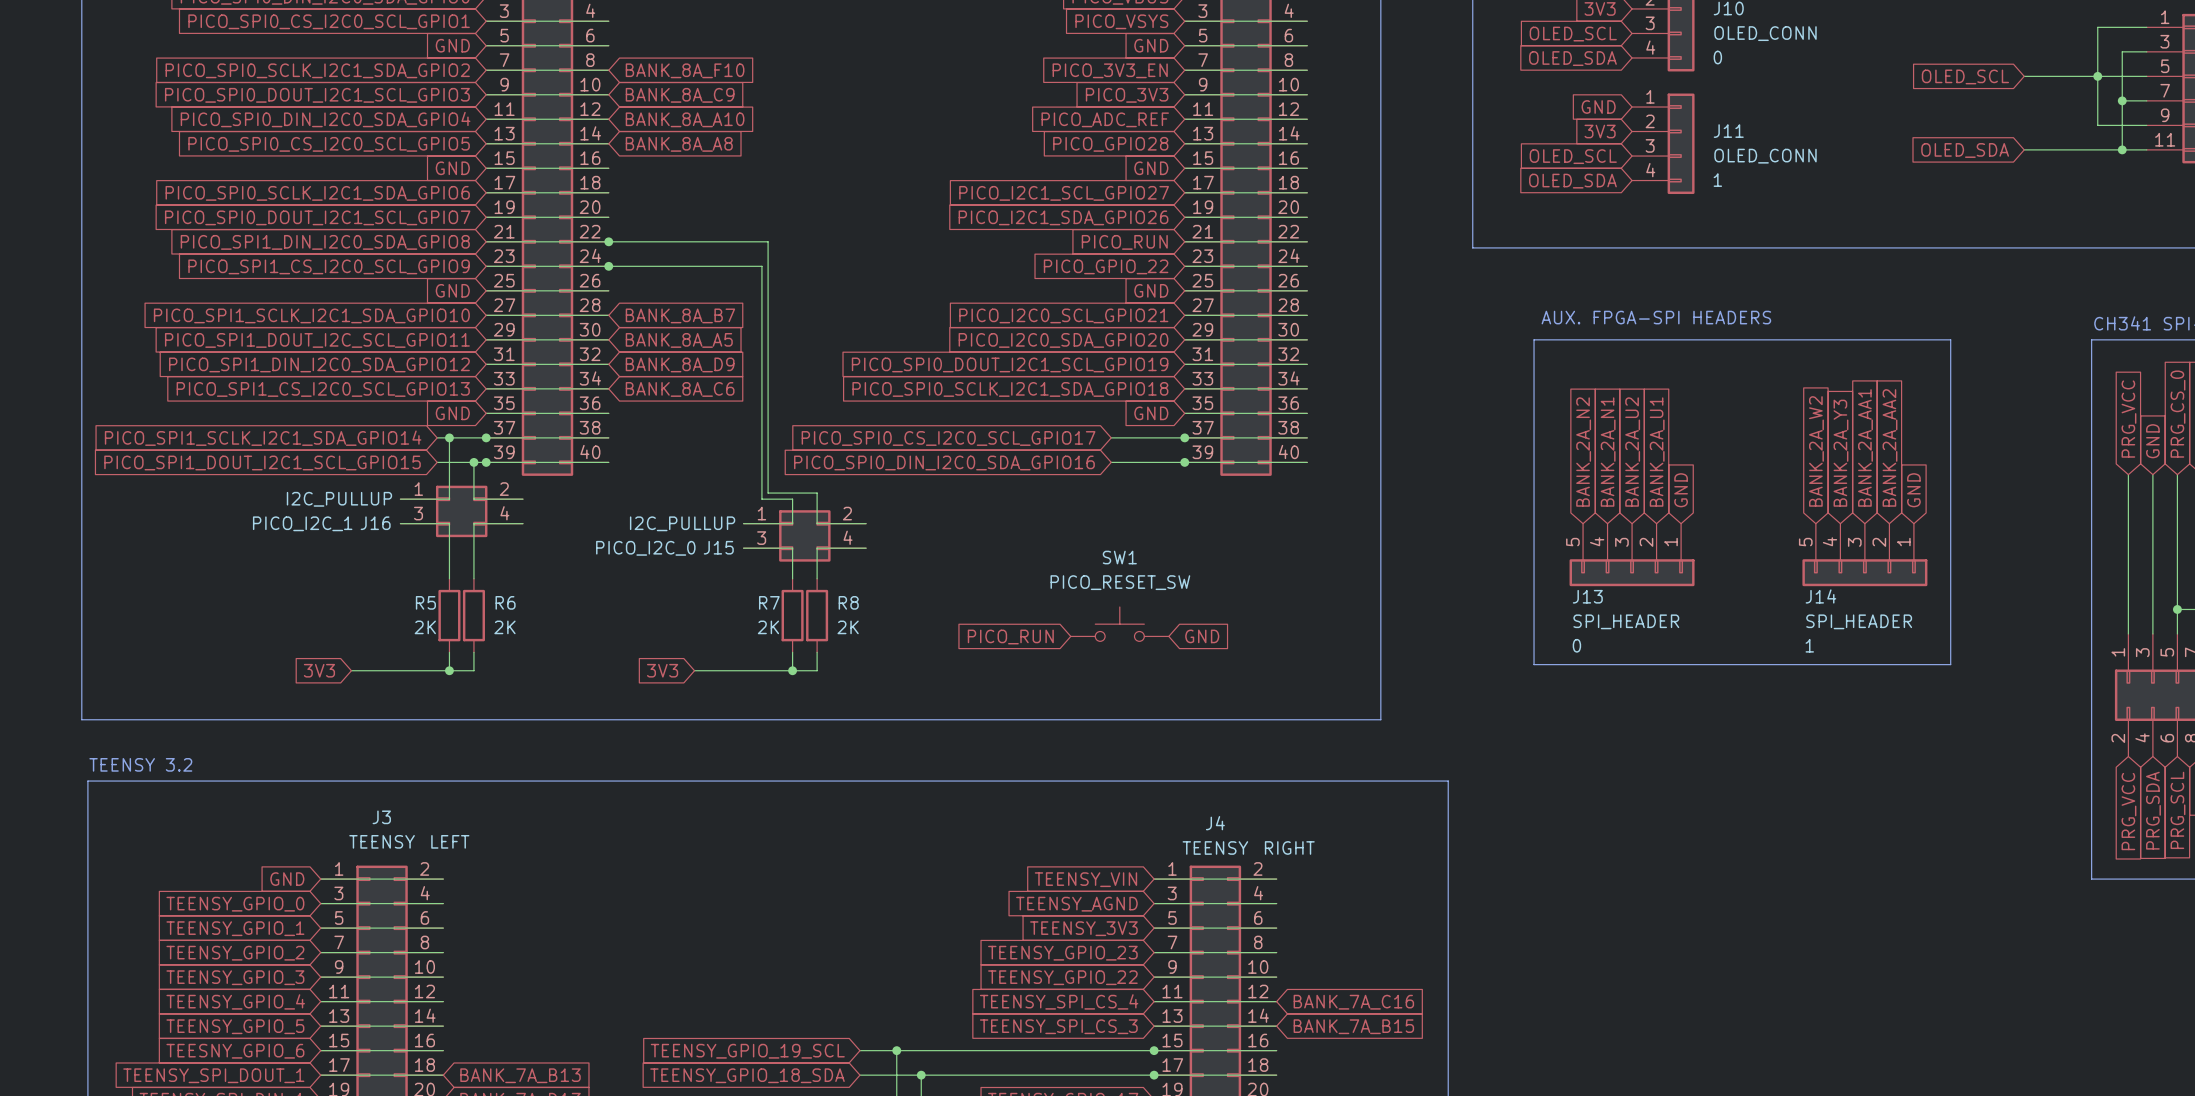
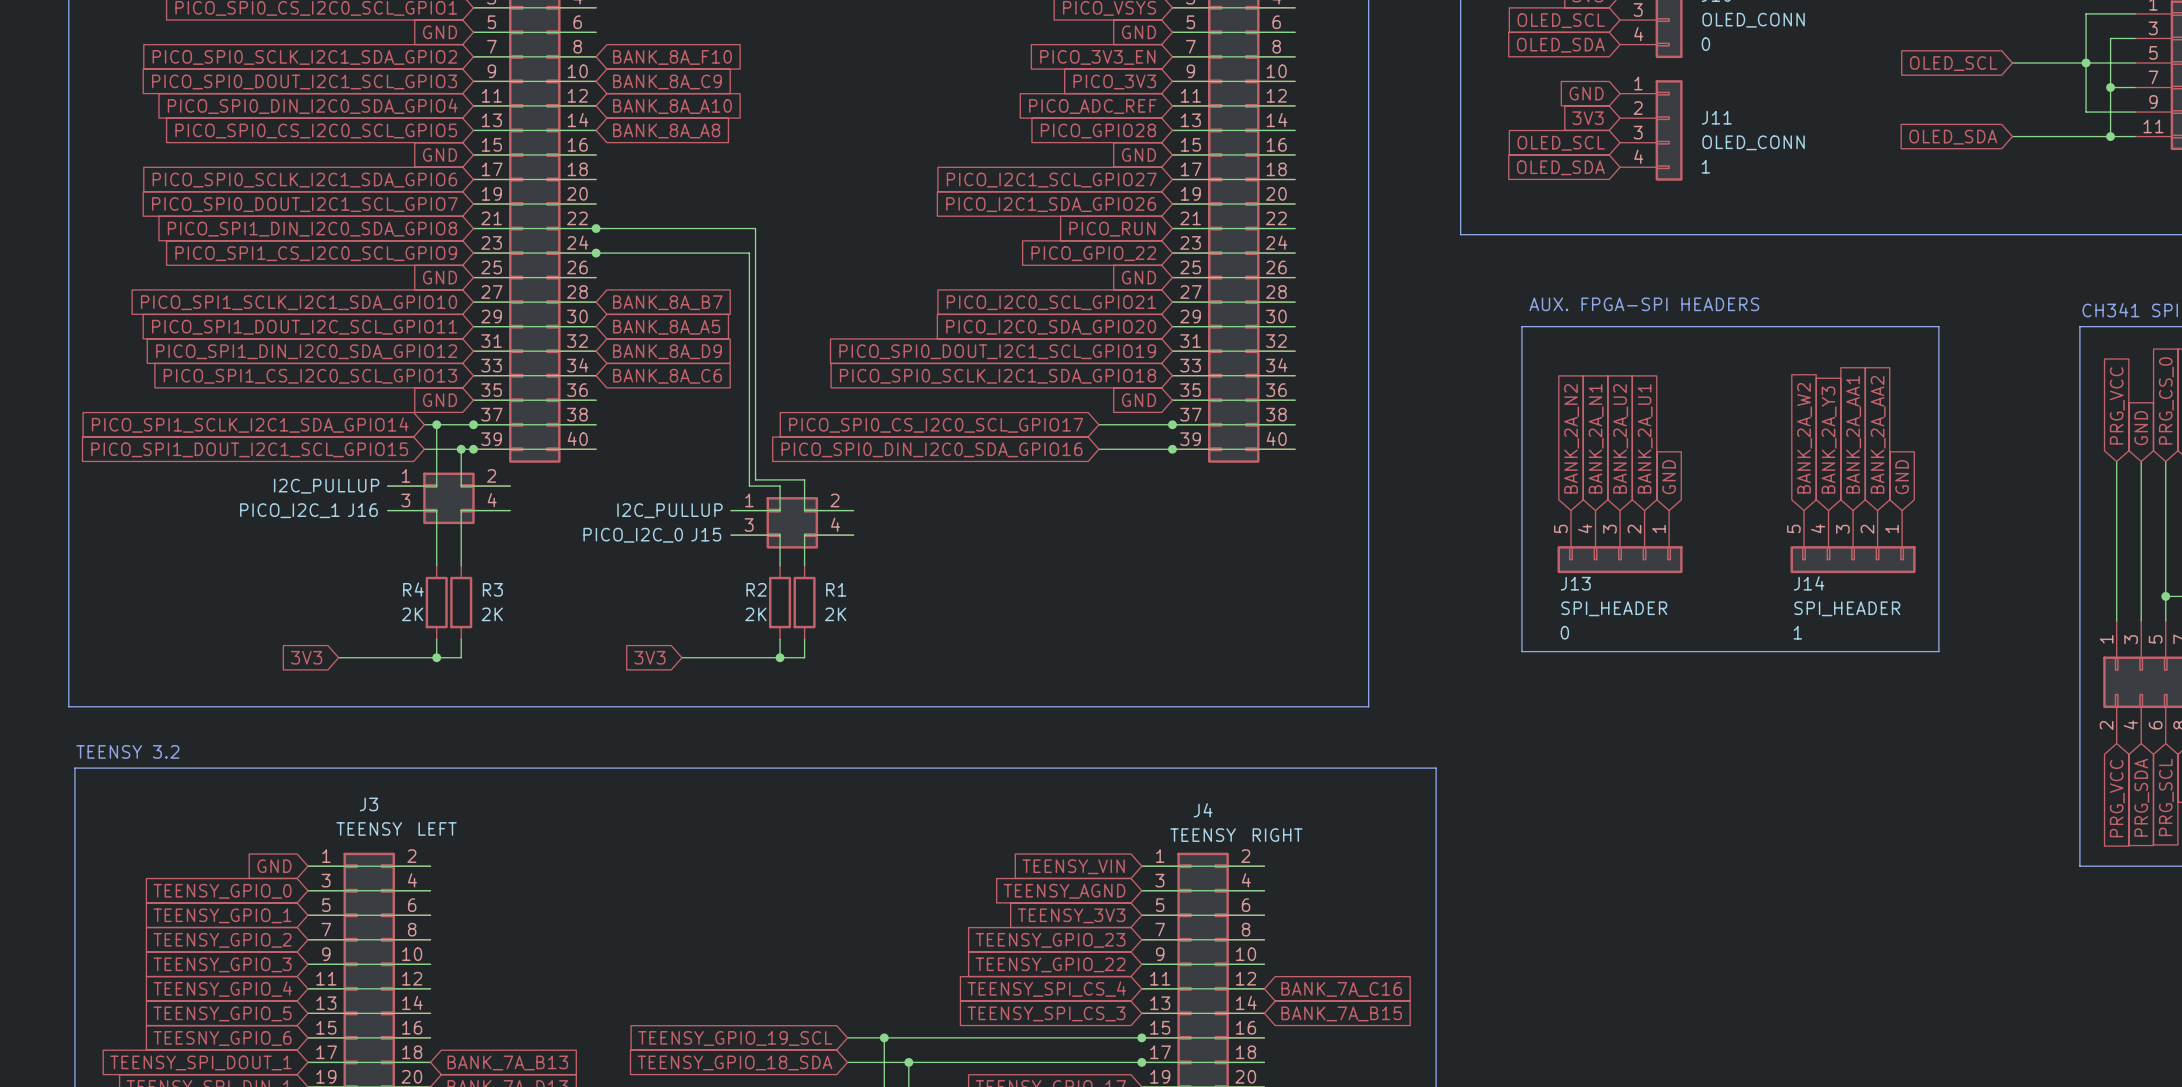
R5 name: R5 (425, 602) -> R4 (413, 589)
R6 name: R6 (505, 602) -> R3 (492, 589)
R7 name: R7 (769, 602) -> R2 (756, 589)
R8 name: R8 (848, 602) -> R1 (836, 589)
SW1: PICO_RESET_SW (1119, 624) -> none
global label: GND (1202, 636) -> none
global label: PICO_RUN (1010, 637) -> none

